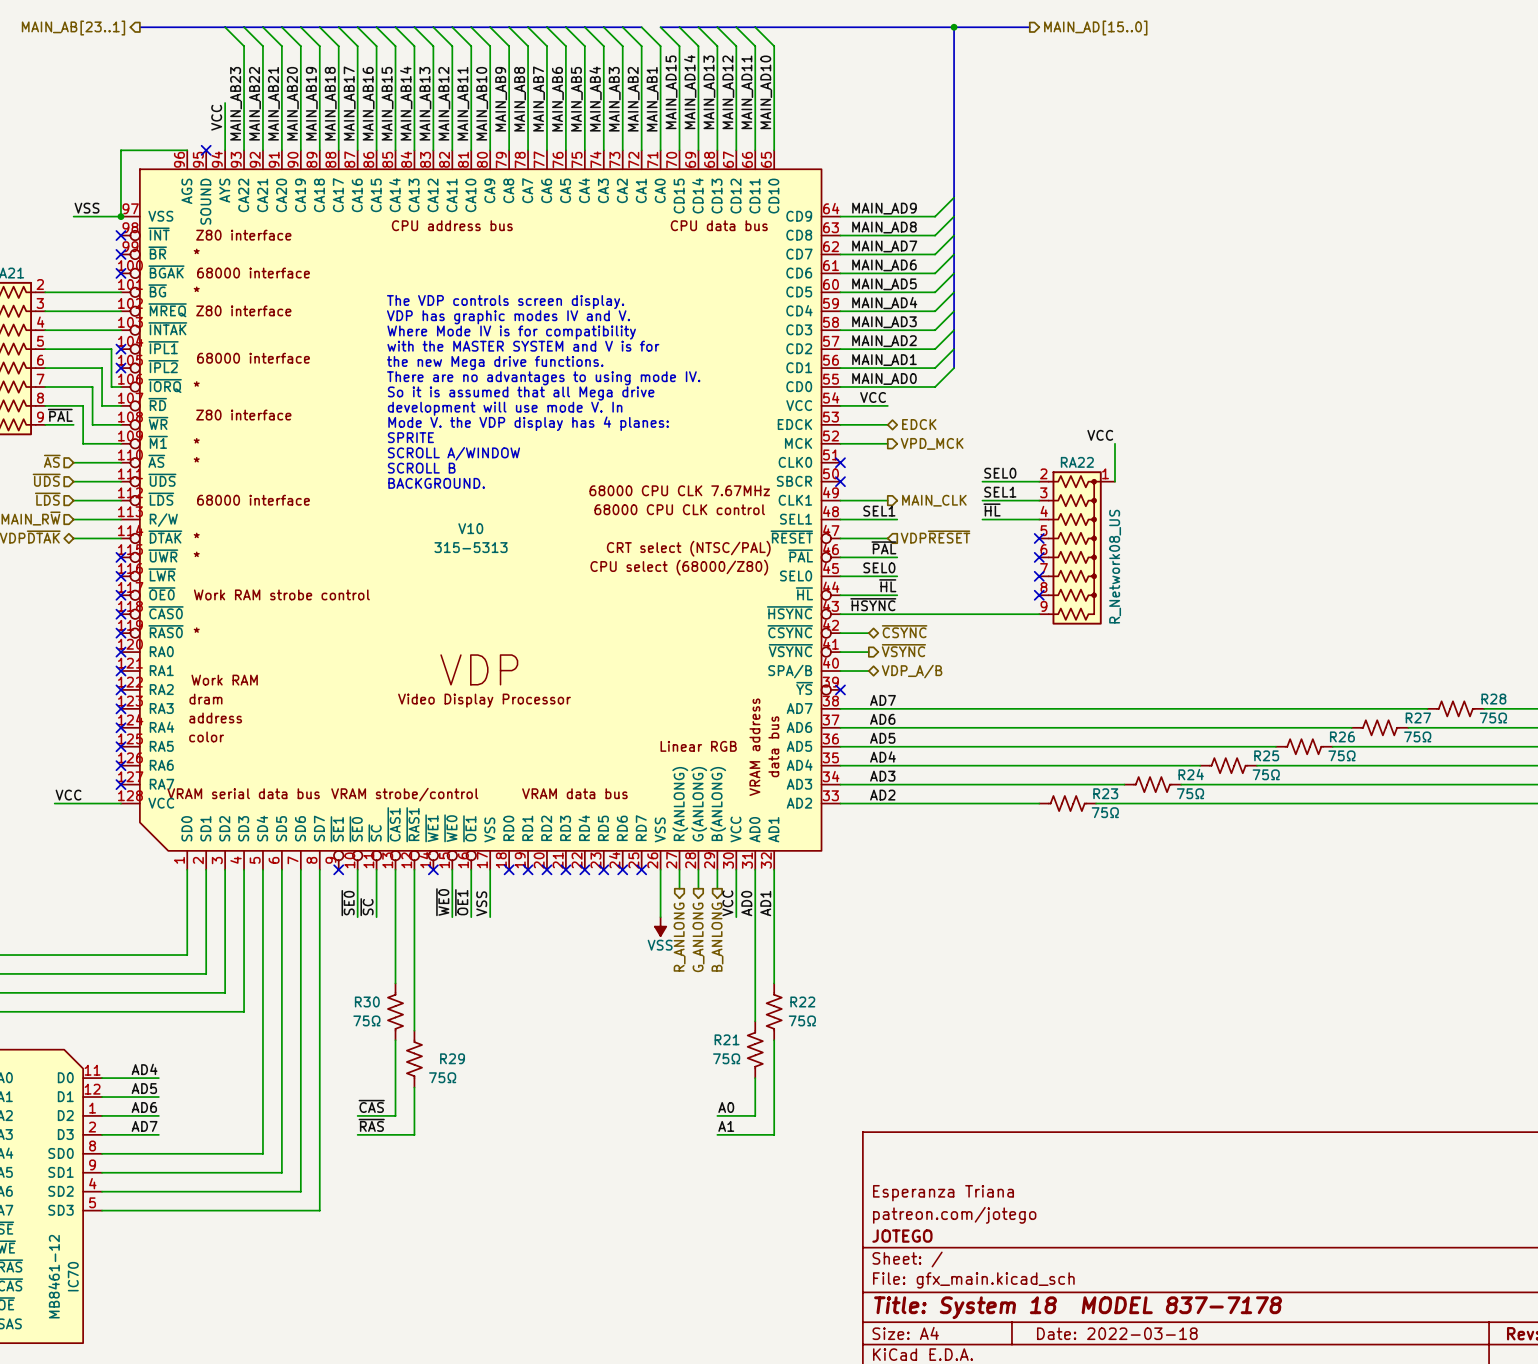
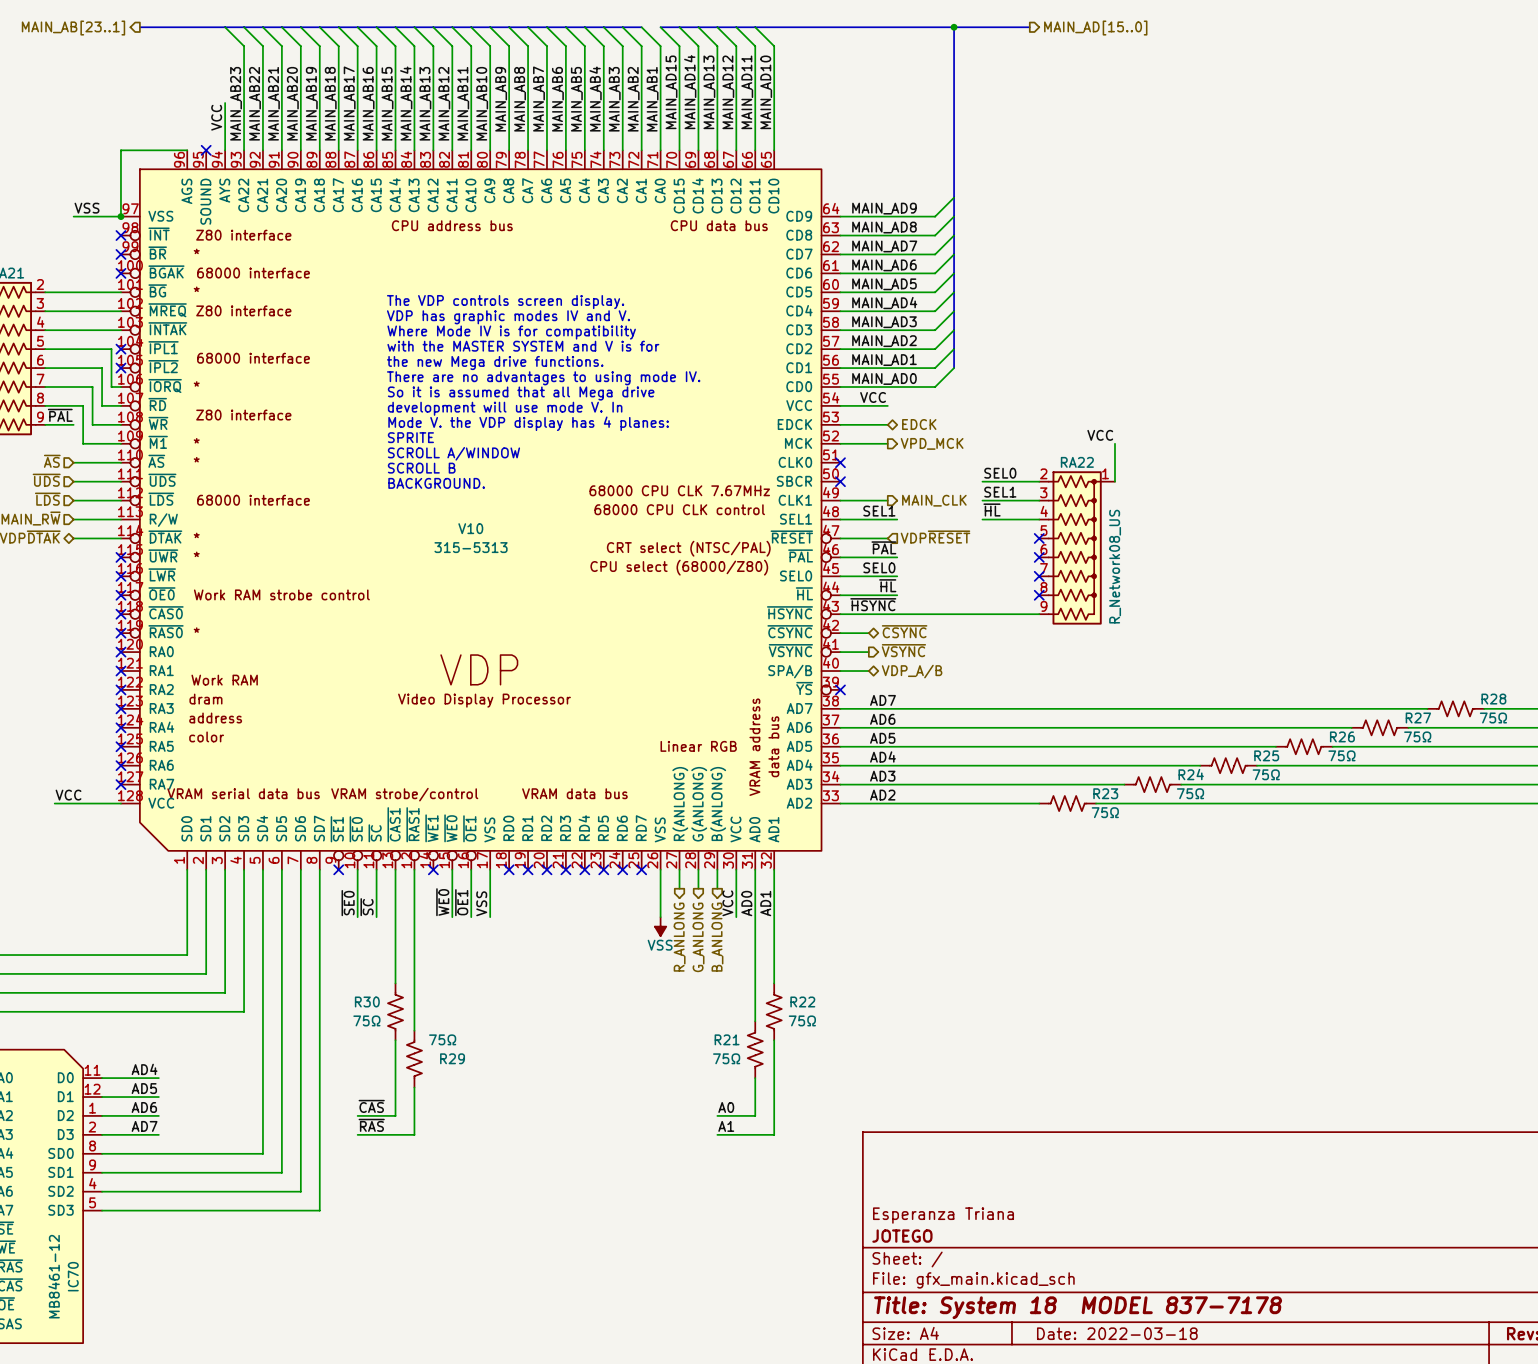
R30: 75Ω (395, 1011) -> none
75Ω: none -> R30 (395, 1011)
R29 flip: as is (414, 1059) -> left-right (414, 1059)
R29 value position: 75Ω (442, 1077) -> 75Ω (442, 1039)
title block: Esperanza Triana (943, 1193) -> none
title block: patreon.com/jotego (954, 1215) -> Esperanza Triana (943, 1215)

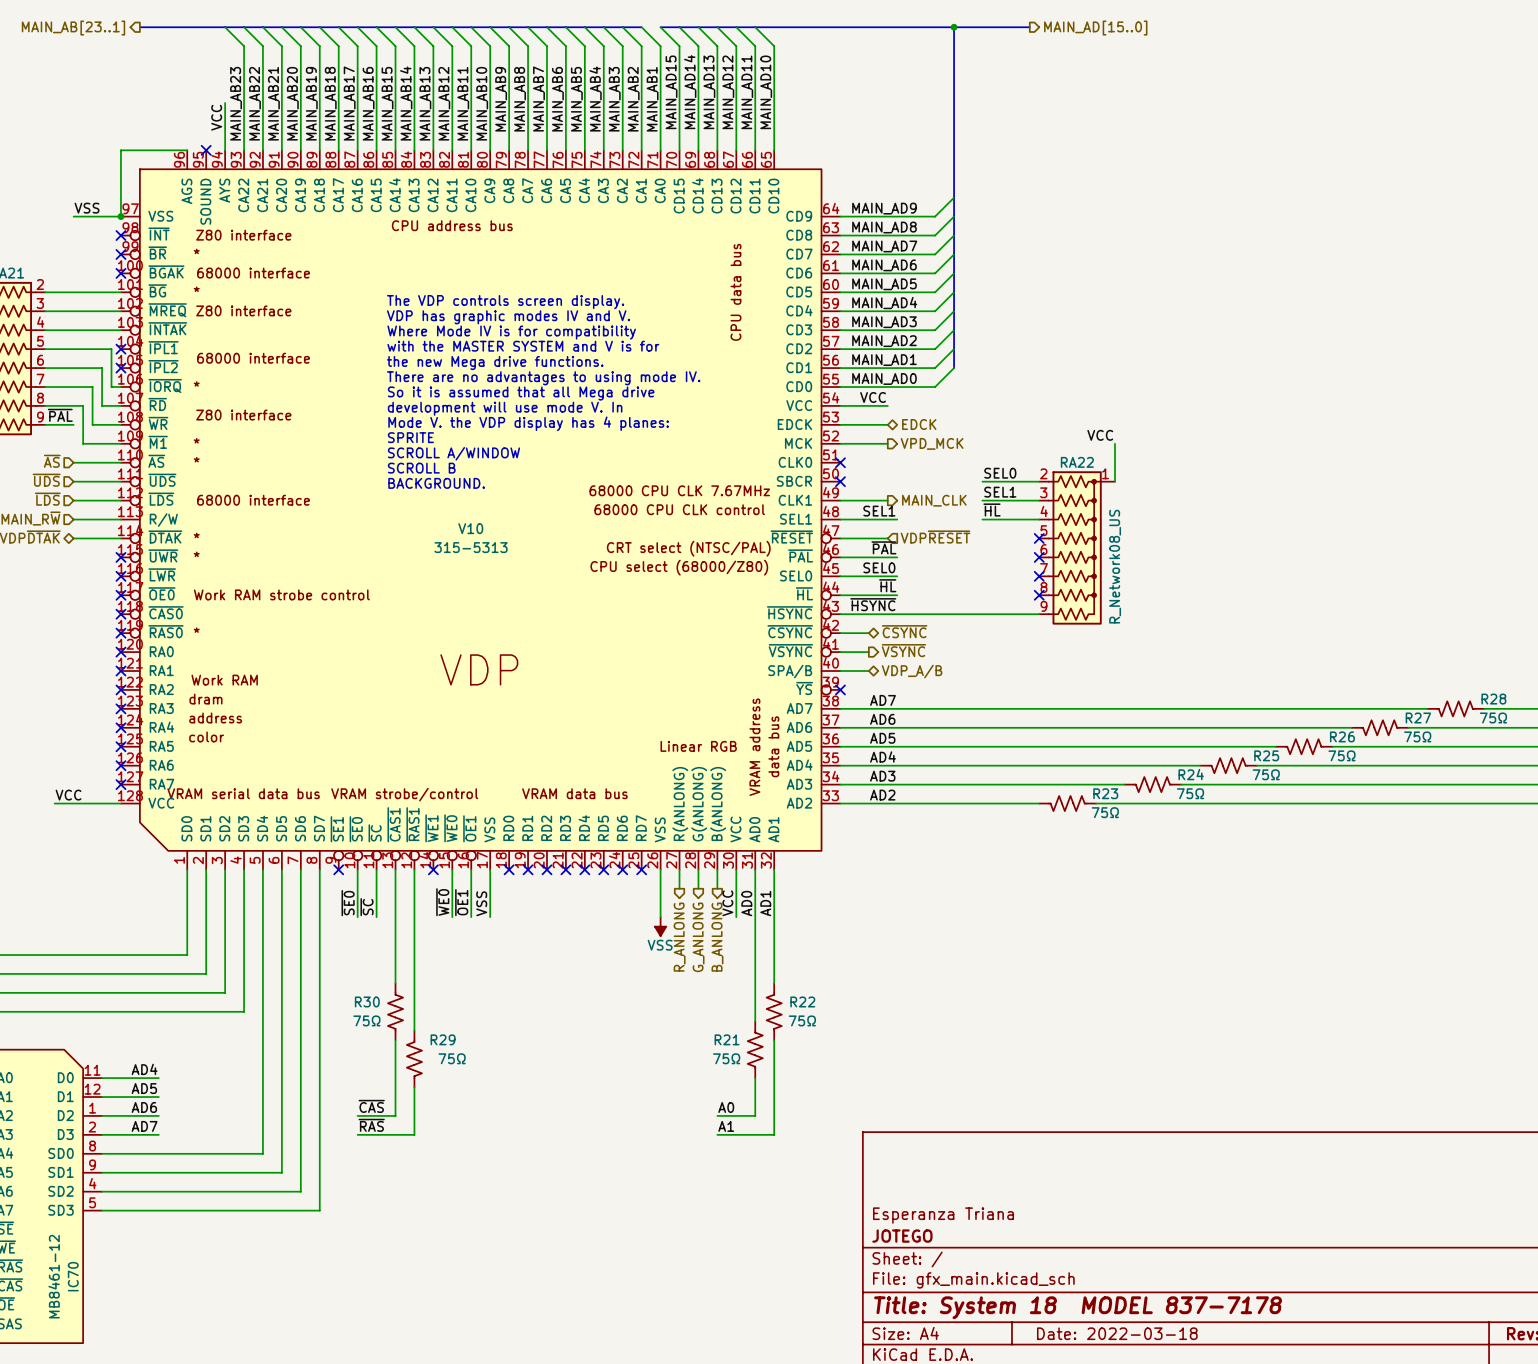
V10 text rotation: 0° (719, 225) -> 90° counterclockwise (735, 292)
V10 text: Video Display Processor (484, 700) -> none
R28: 75Ω (1455, 708) -> none
75Ω: none -> R28 (1455, 708)
R27: 75Ω (1380, 727) -> none
75Ω: none -> R27 (1380, 727)
R26: 75Ω (1304, 746) -> none
75Ω: none -> R26 (1304, 746)
R25: 75Ω (1228, 765) -> none
75Ω: none -> R25 (1228, 765)
R24: 75Ω (1152, 784) -> none
75Ω: none -> R24 (1152, 784)
R23: 75Ω (1067, 803) -> none
75Ω: none -> R23 (1067, 803)
R22: 75Ω (774, 1011) -> none
75Ω: none -> R22 (774, 1011)
R29 value: 75Ω (442, 1039) -> R29 (443, 1039)
R21: 75Ω (755, 1049) -> none
75Ω: none -> R21 (755, 1049)
R29 name: R29 (452, 1058) -> 75Ω (452, 1058)

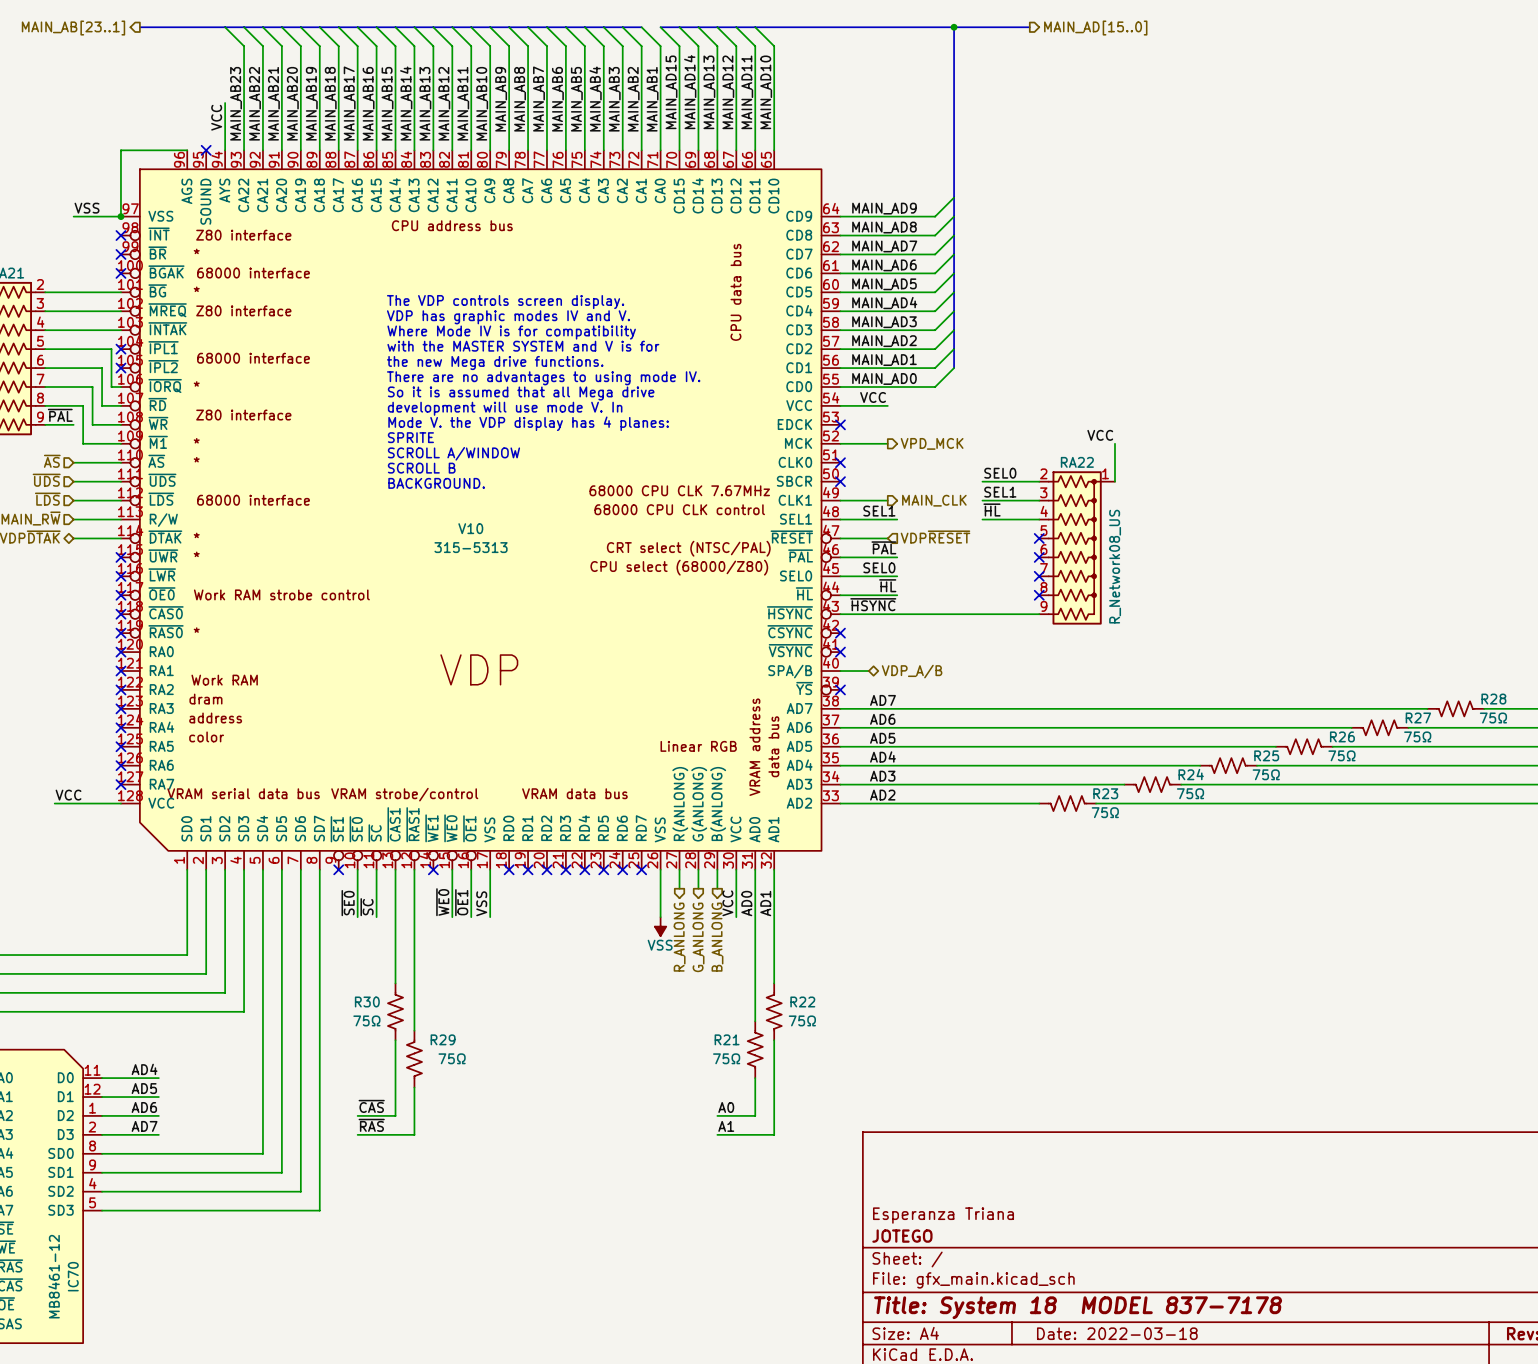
wire: (840, 424) (887, 424) -> none
no-connect mark: none -> (840, 424)
hierarchical label: EDCK (919, 424) -> none
hierarchical label: ~{CSYNC} (904, 631) -> none
wire: (840, 633) (868, 633) -> none
no-connect mark: none -> (840, 633)
hierarchical label: ~{VSYNC} (903, 650) -> none
wire: (840, 652) (868, 652) -> none
no-connect mark: none -> (840, 652)

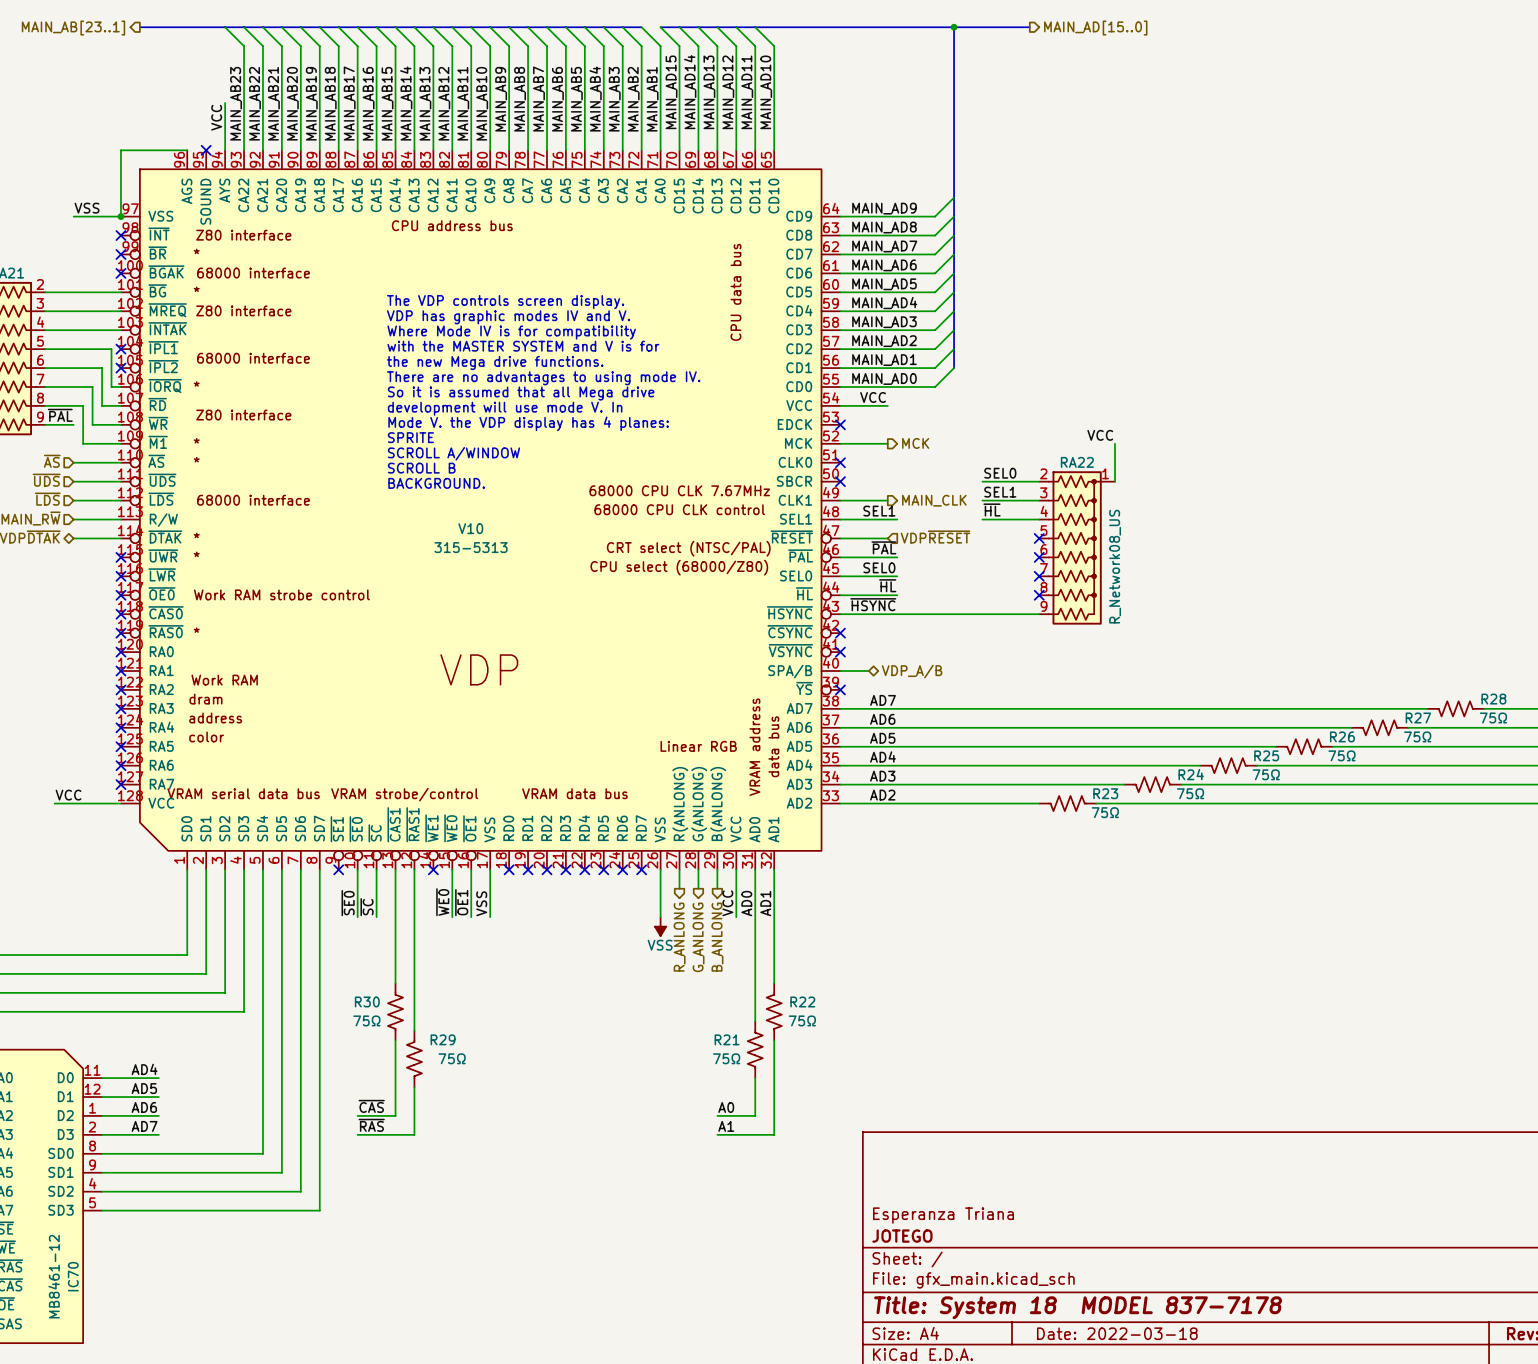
hierarchical label: VPD_MCK (932, 443) -> MCK (915, 443)

